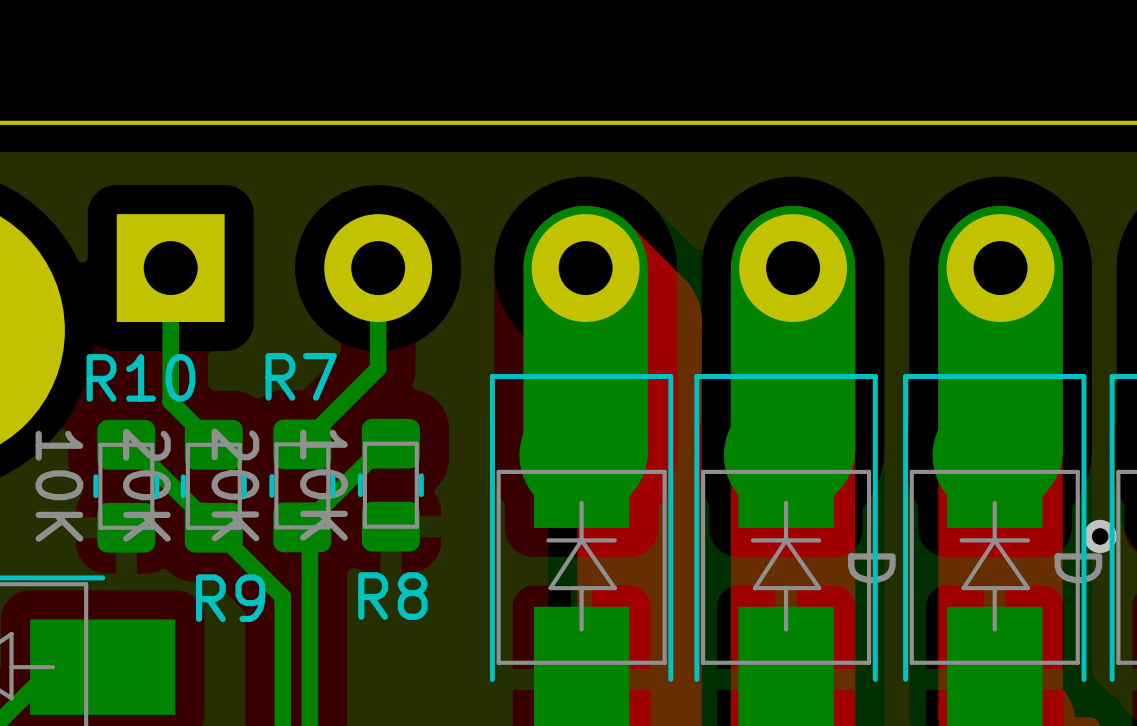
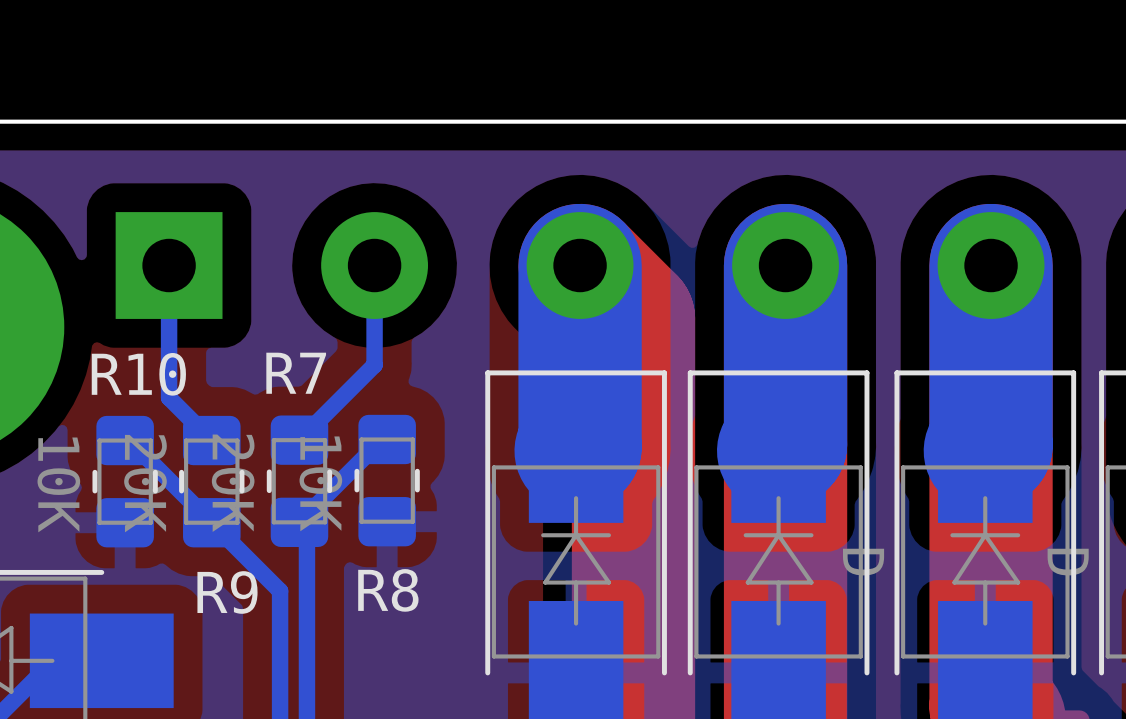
via: (1100, 536) -> none

